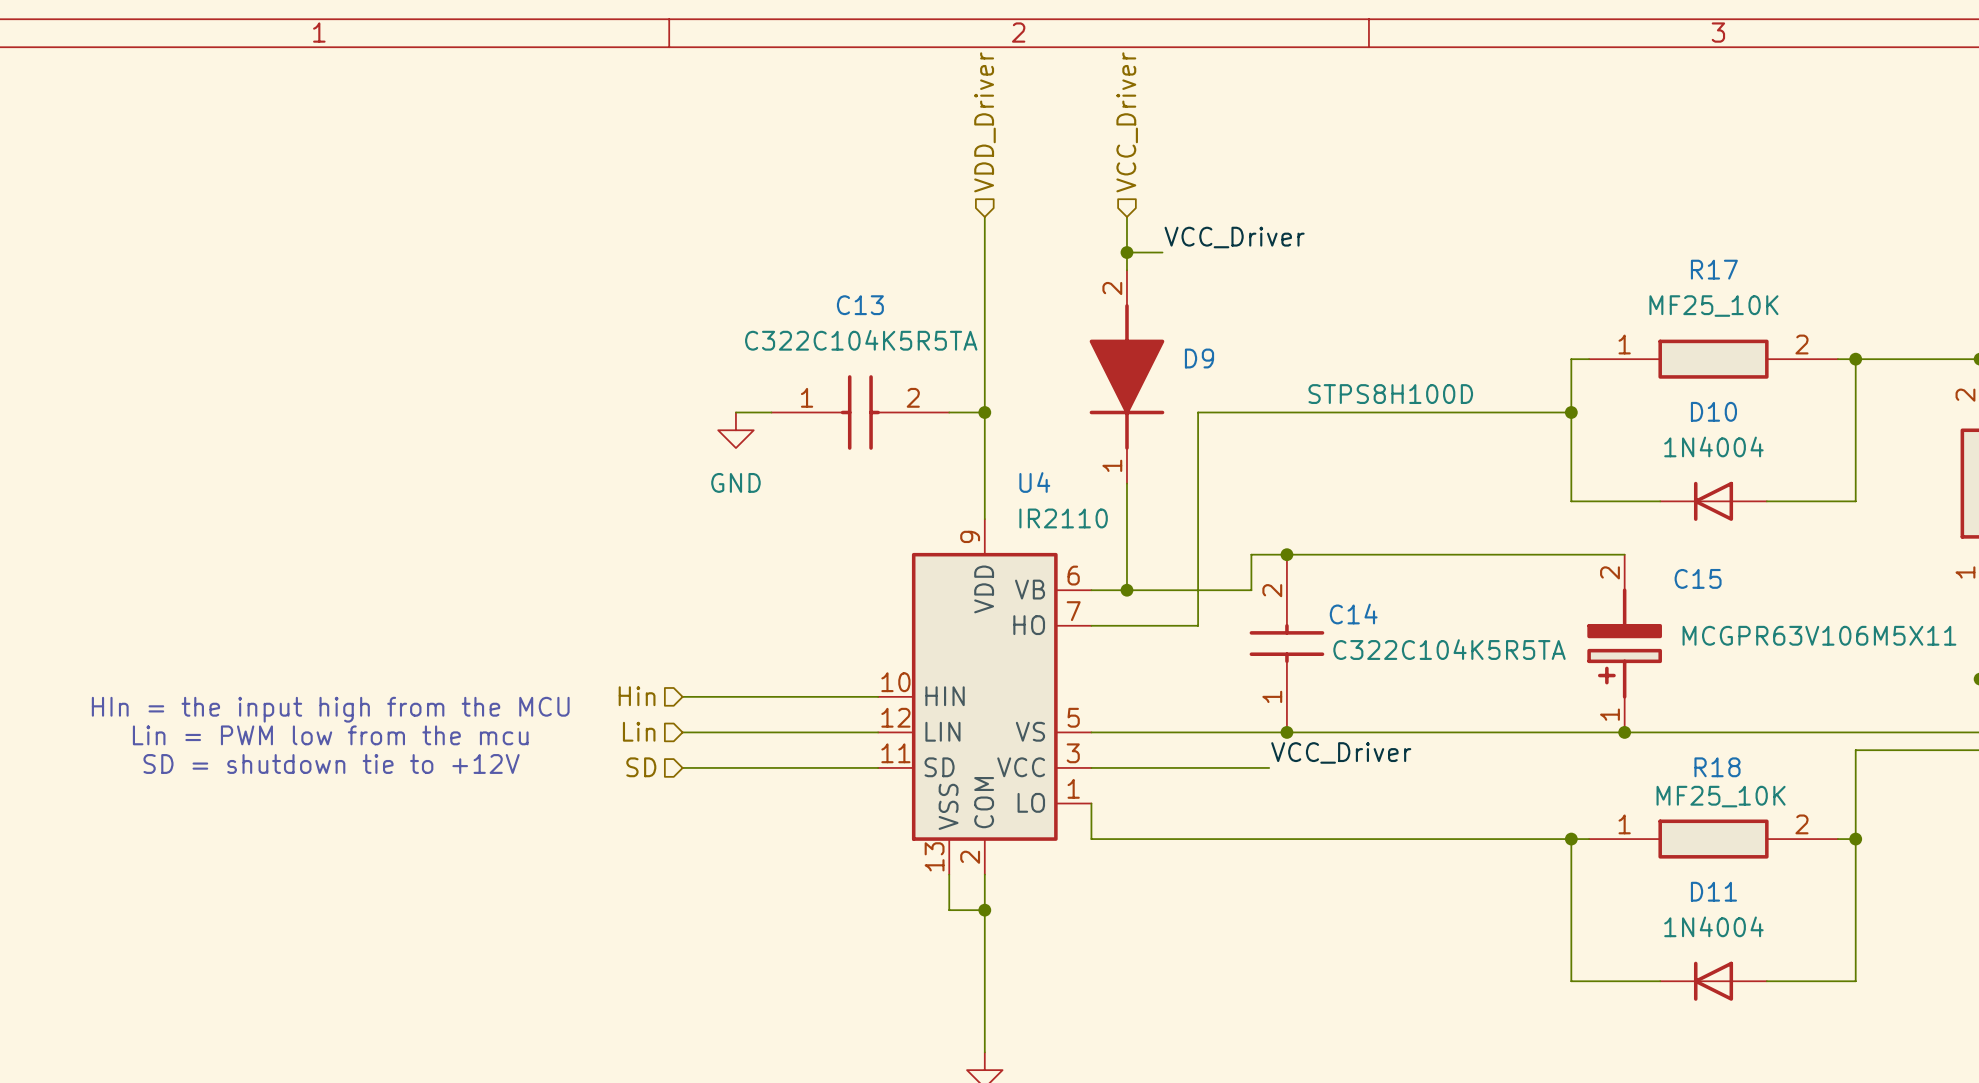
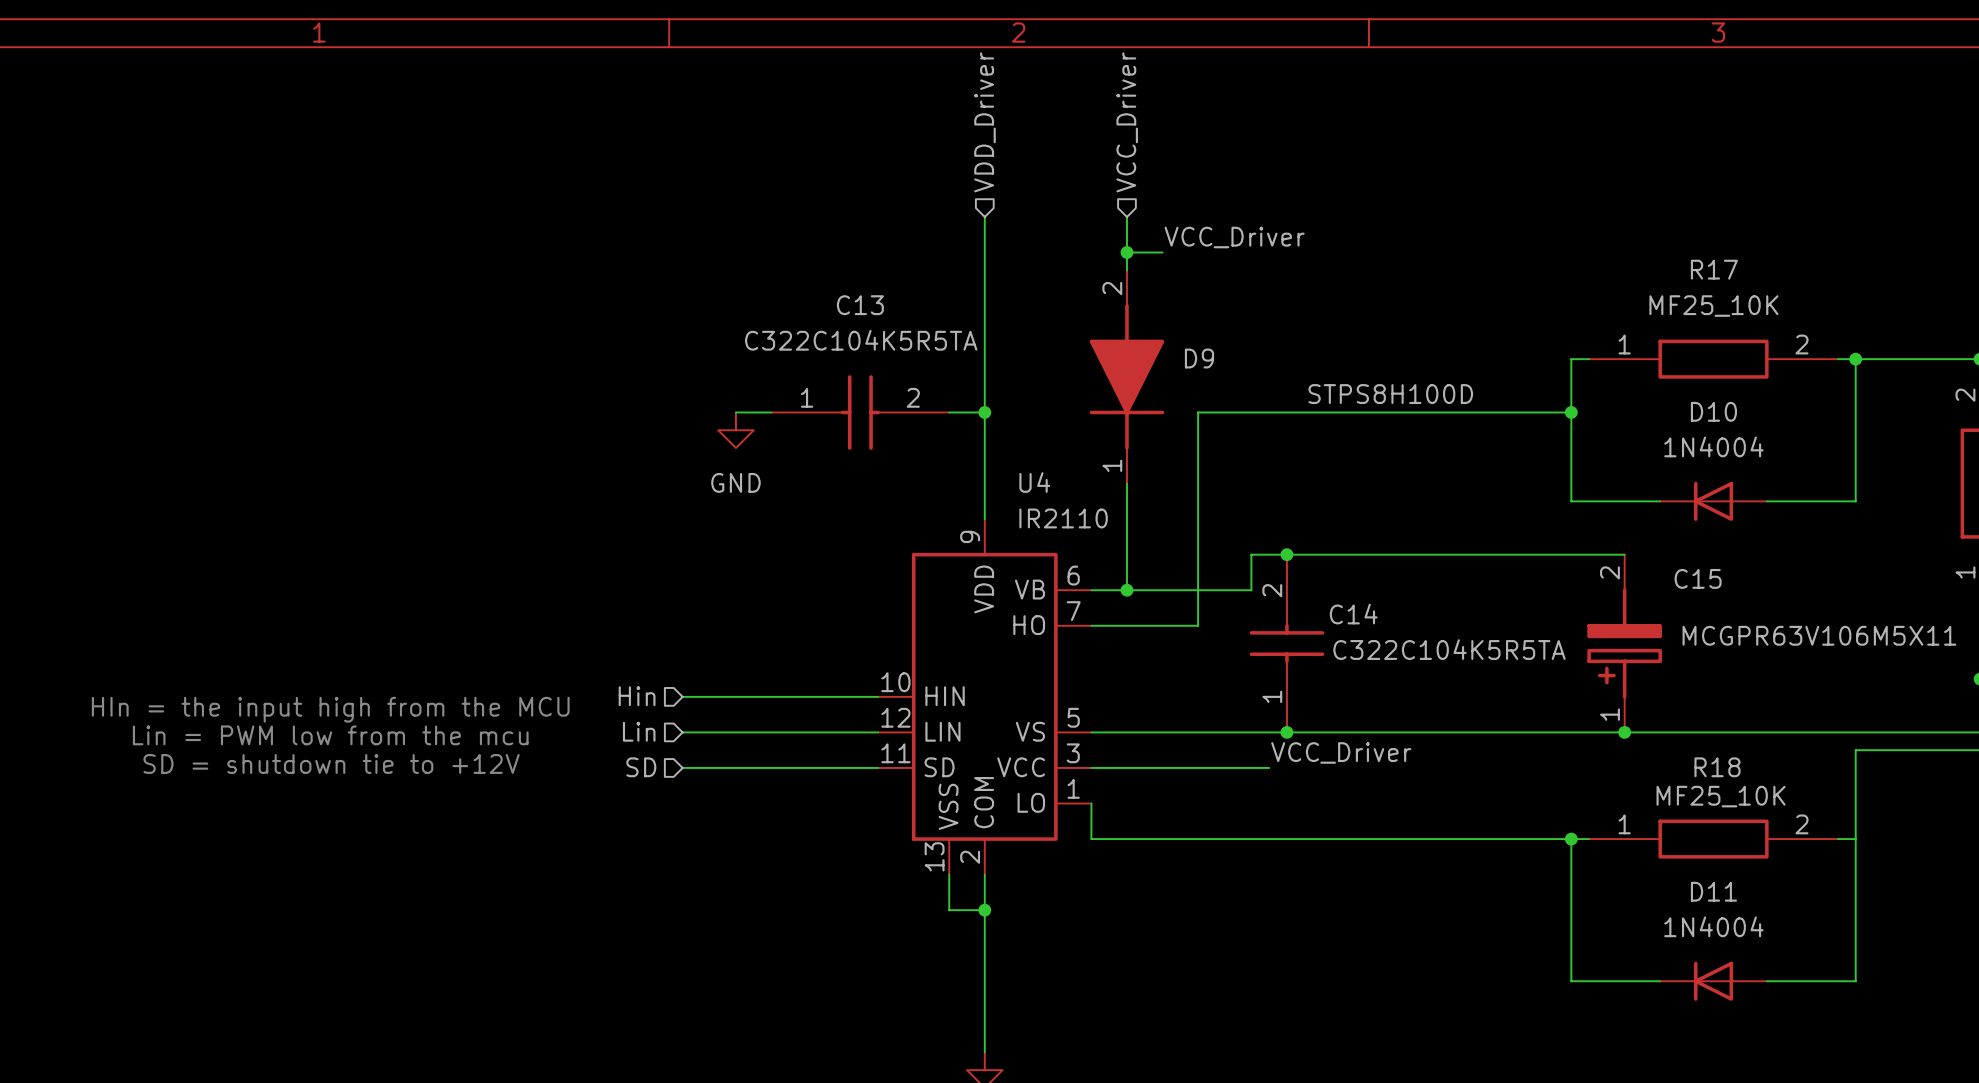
junction: (1855, 839) -> none

